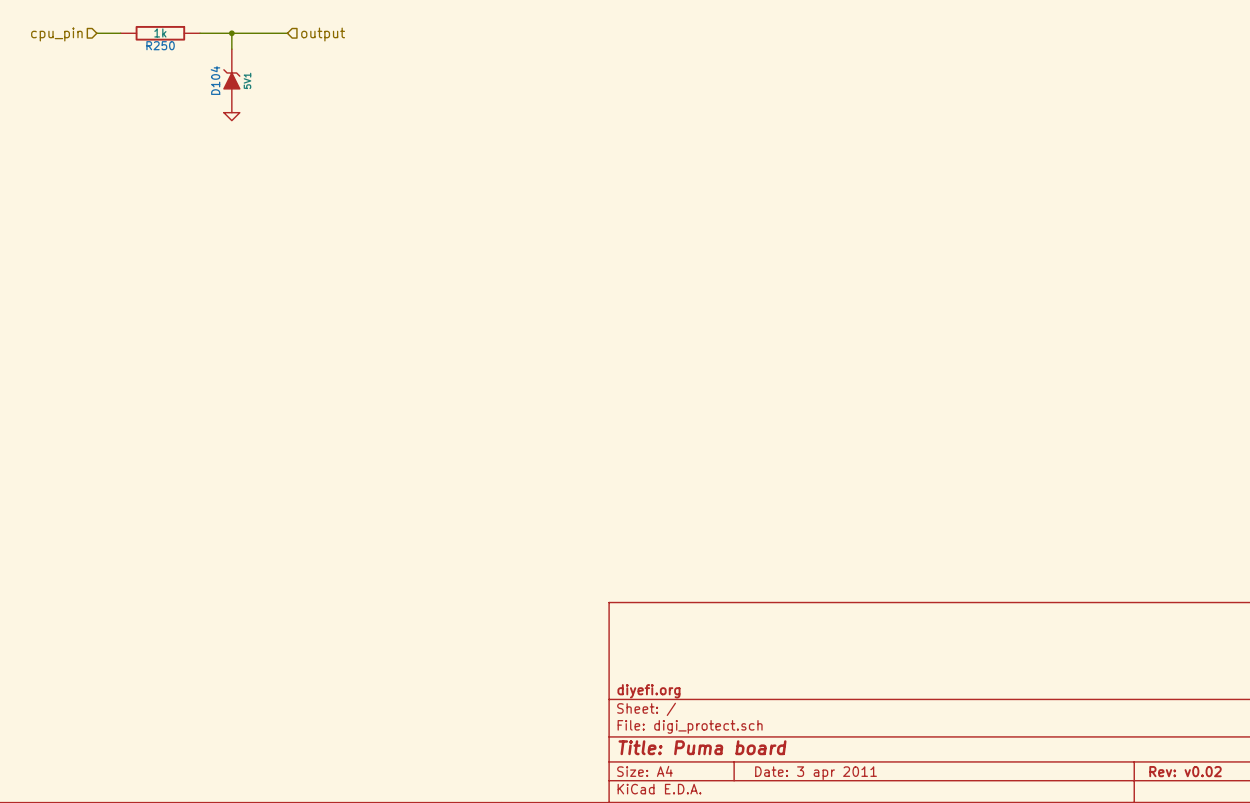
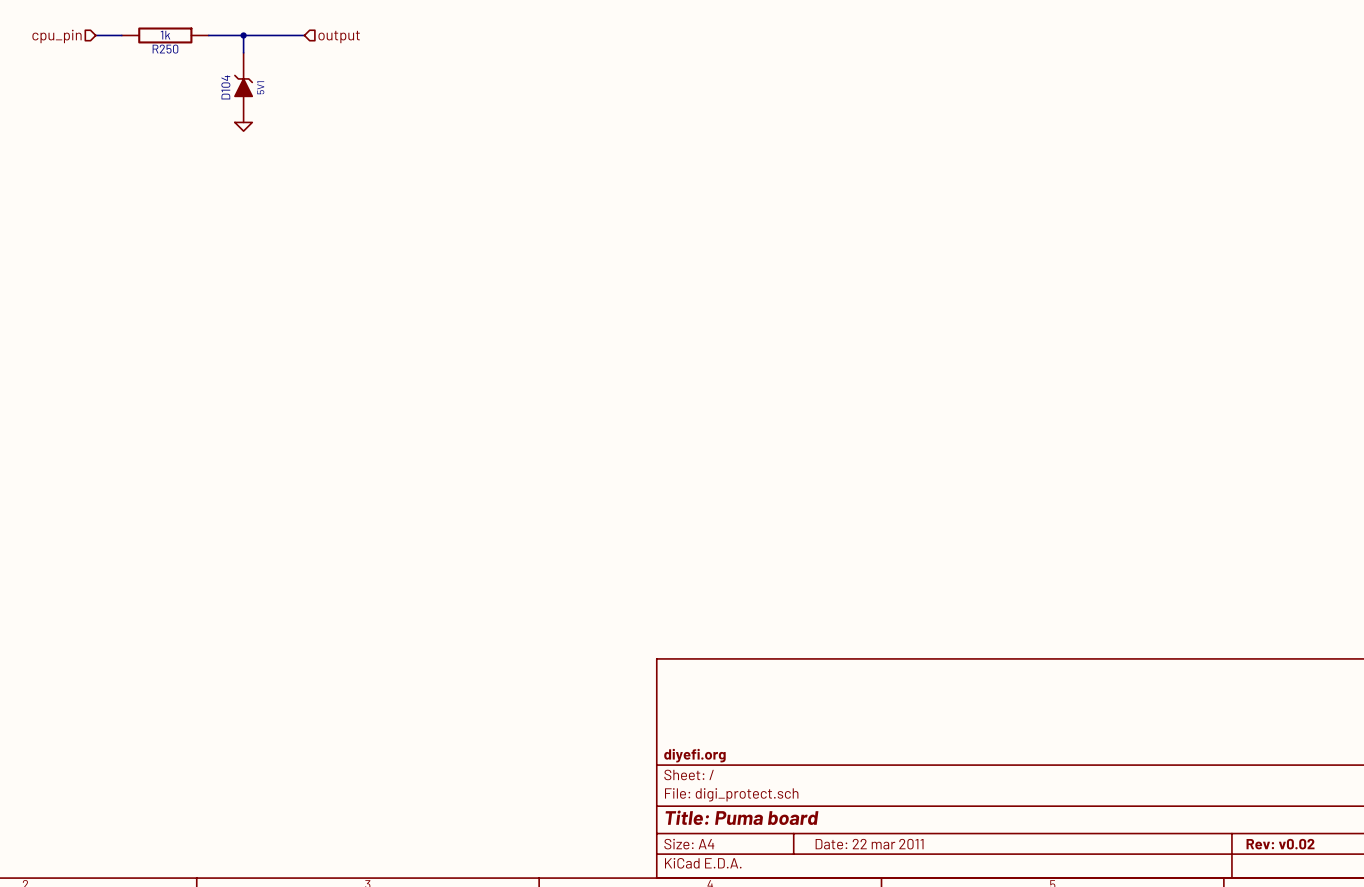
title block: Date: 3 apr 2011 (816, 773) -> Date: 22 mar 2011 (869, 844)

